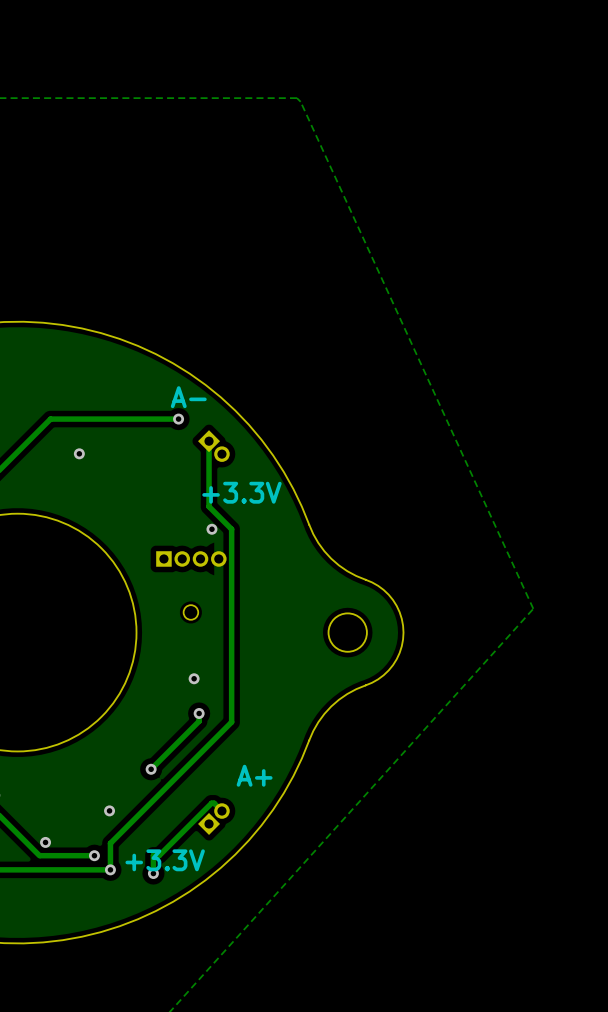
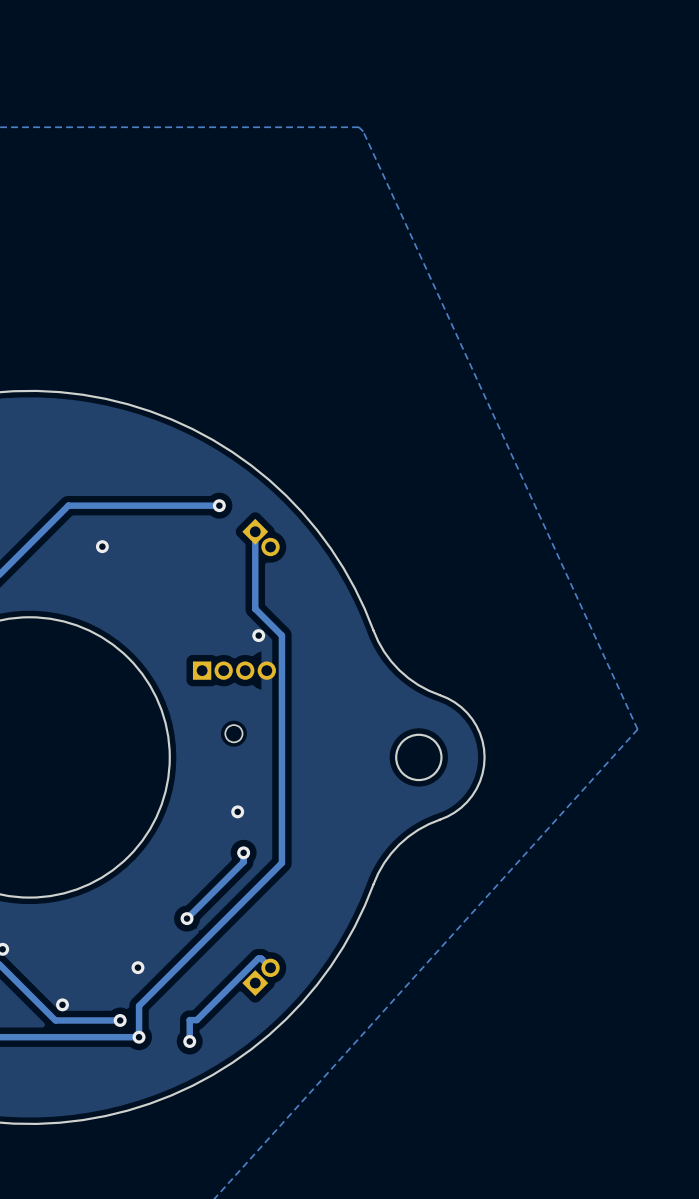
text: A- (188, 397) -> none
text: +3.3V (241, 492) -> none
text: A+ (254, 775) -> none
text: +3.3V (165, 860) -> none

